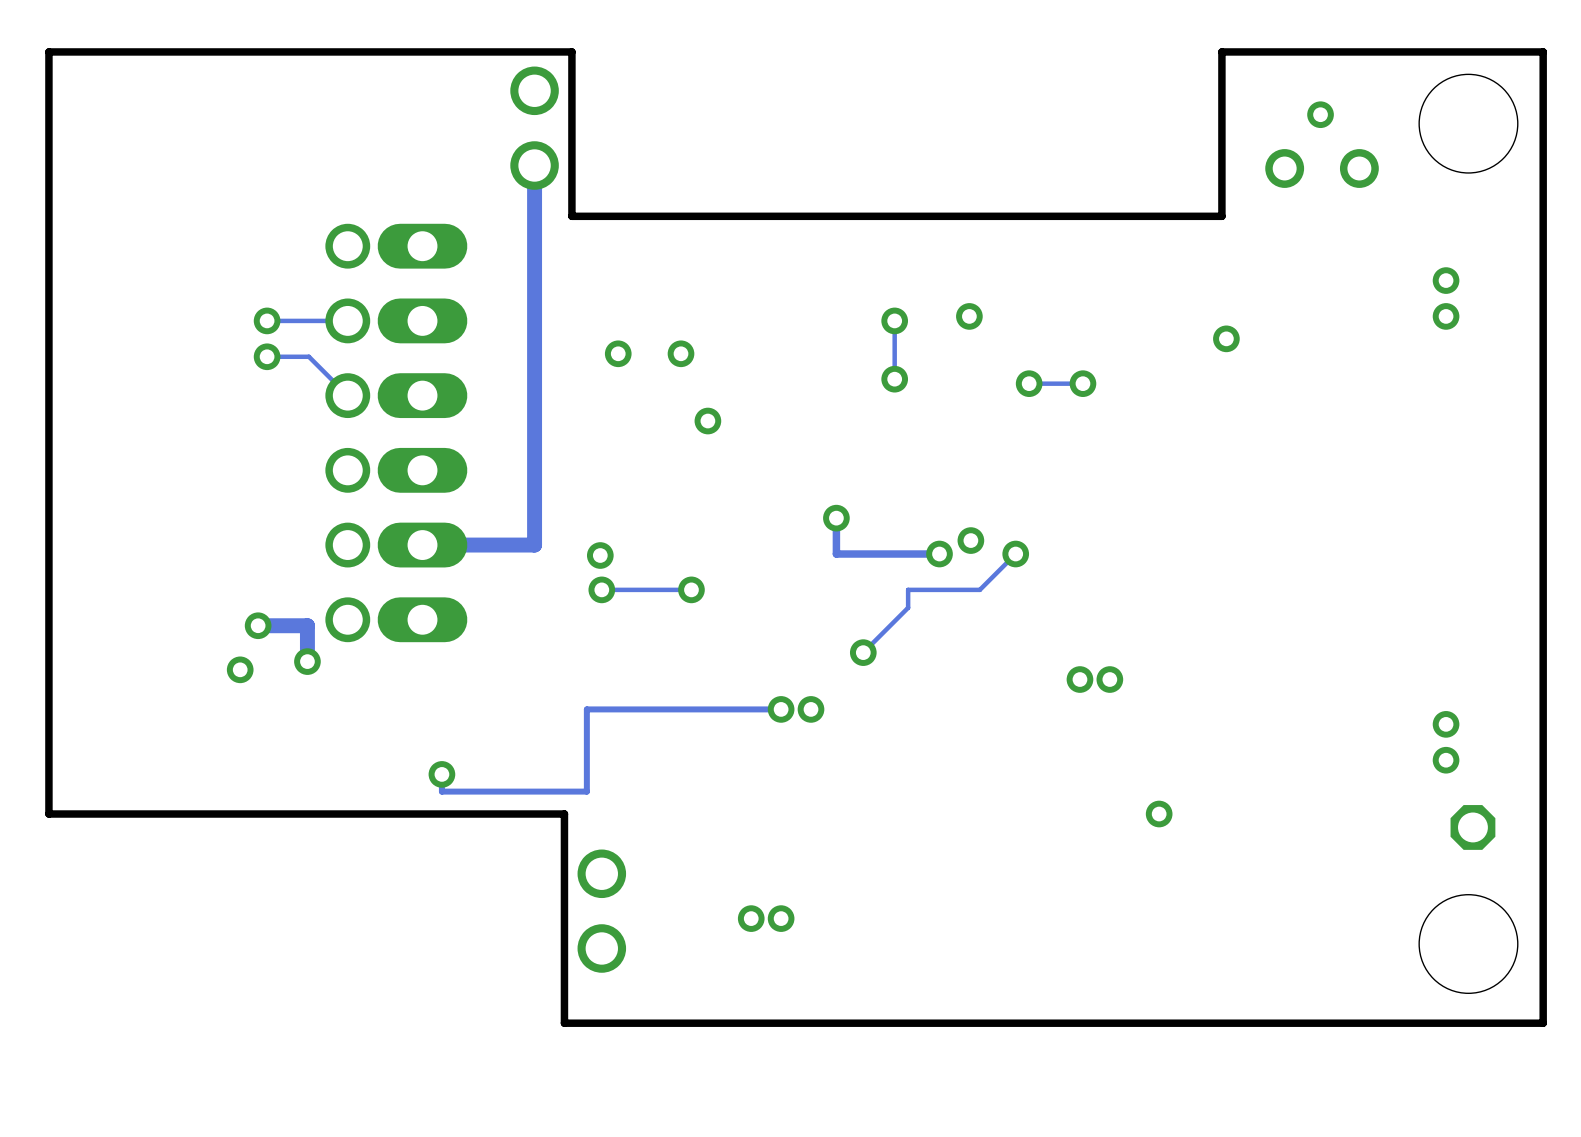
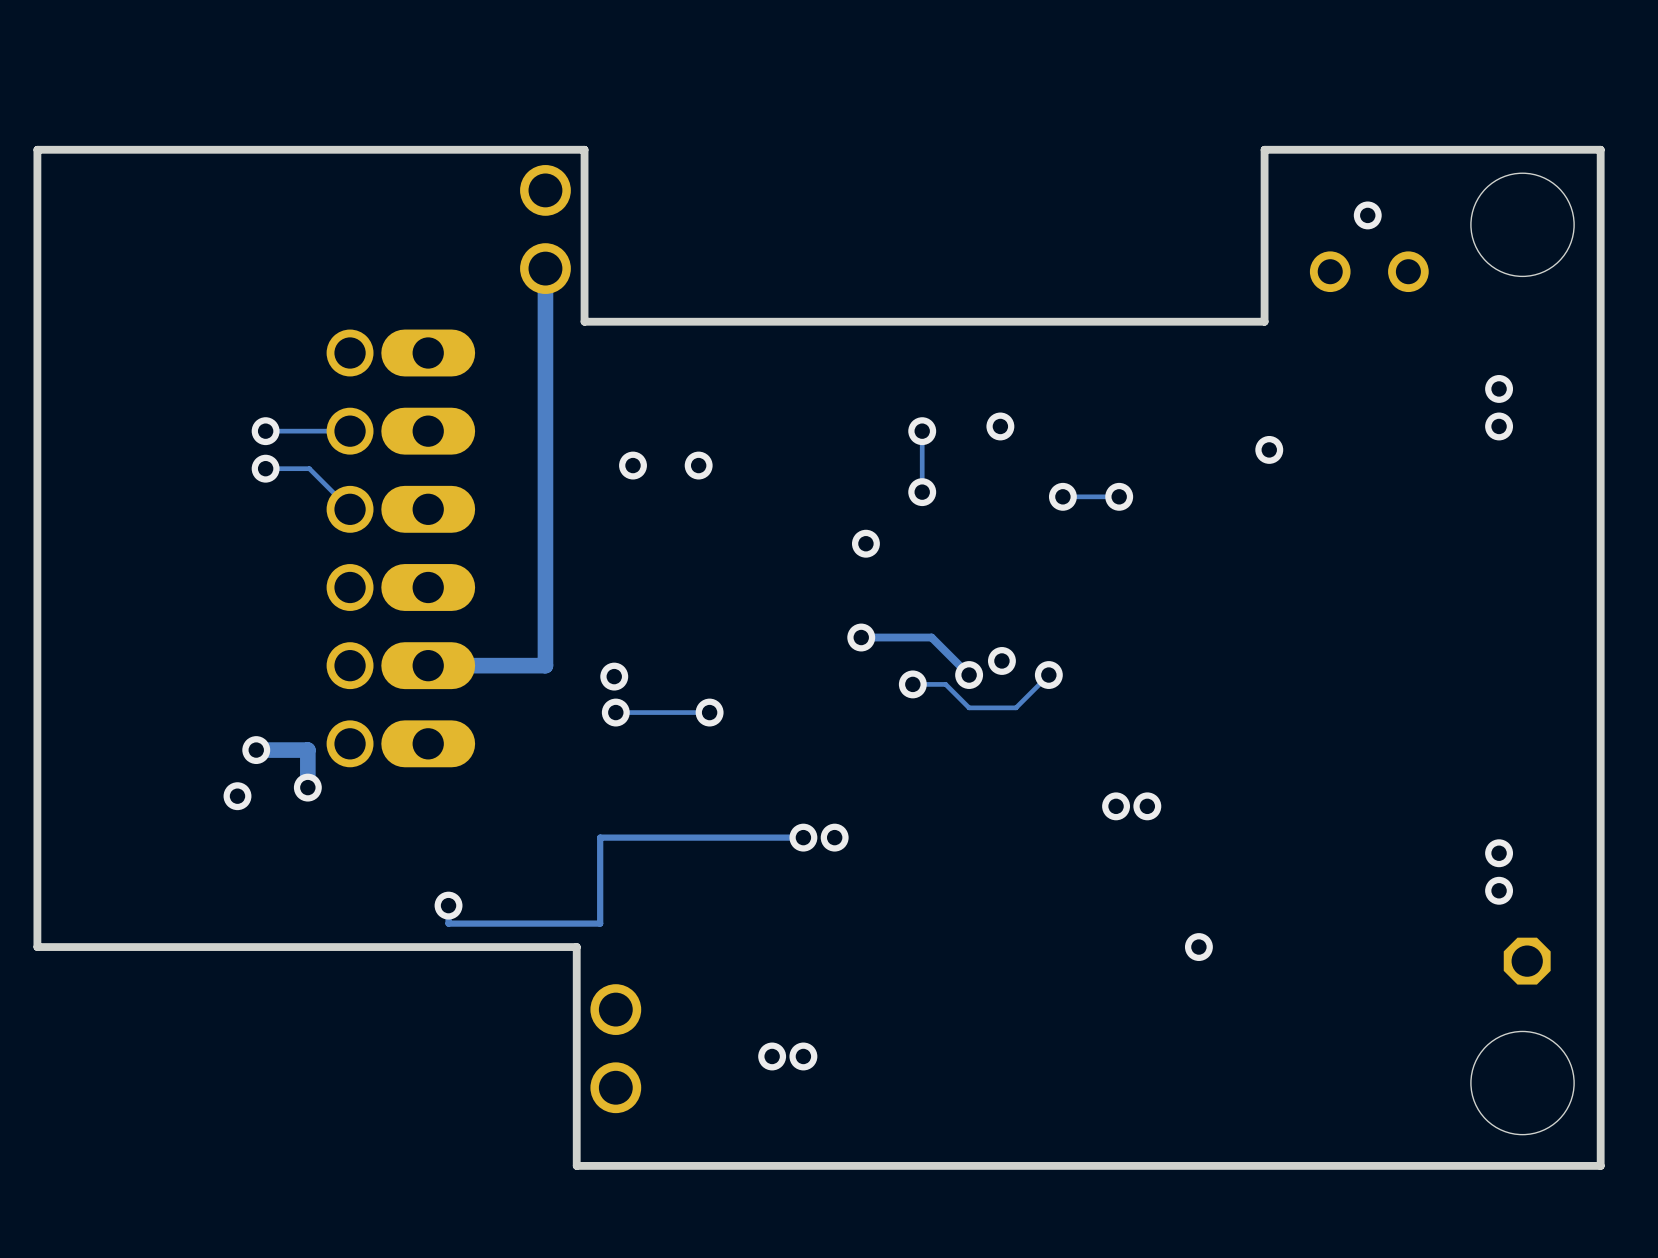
via: (707, 421) -> none
via: none -> (865, 543)
track: (836, 518) (836, 554) (939, 554) -> (861, 637) (931, 637) (969, 675)
track: (984, 585) (979, 589) (908, 589) (908, 607) (863, 652) -> (1016, 707) (969, 707) (945, 684) (912, 684)
via position: (863, 652) -> (912, 684)

